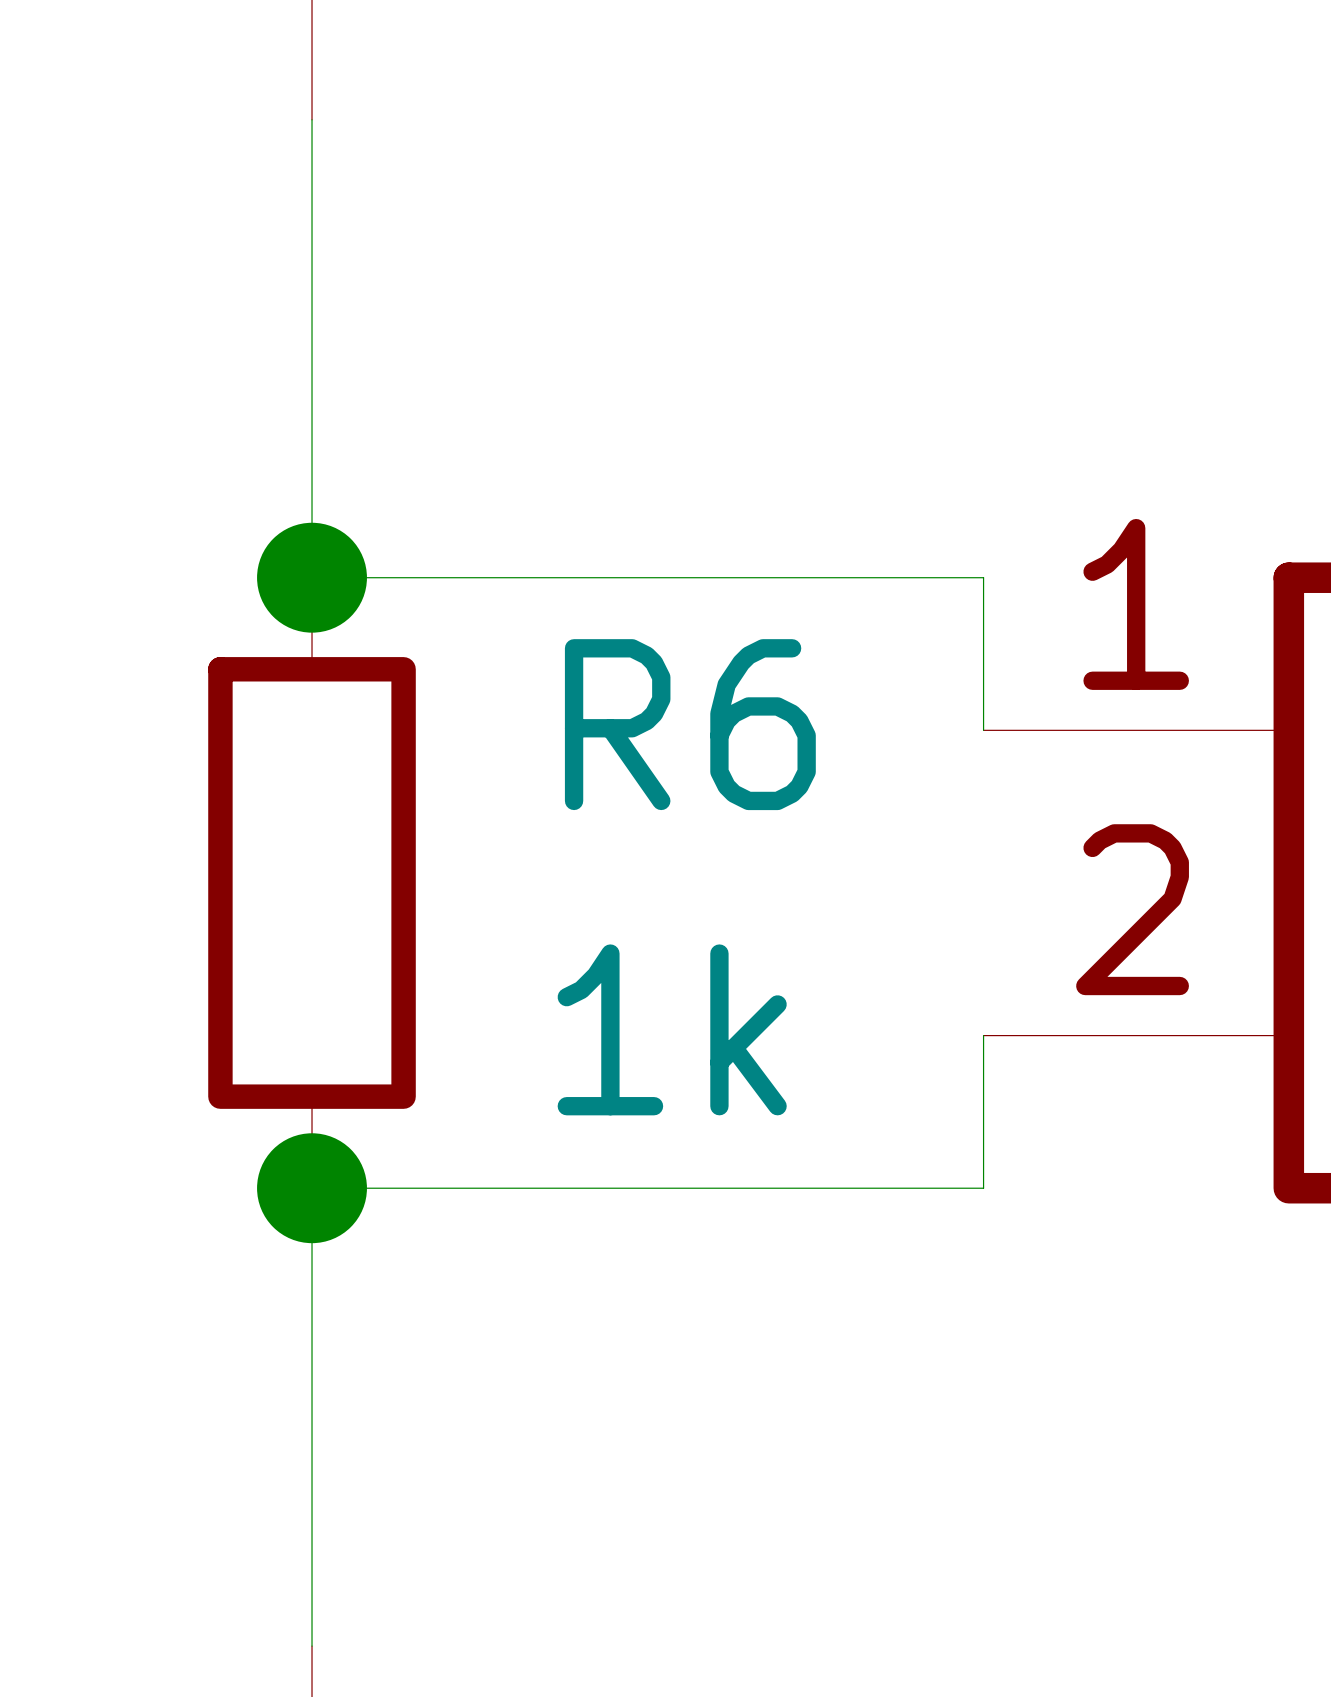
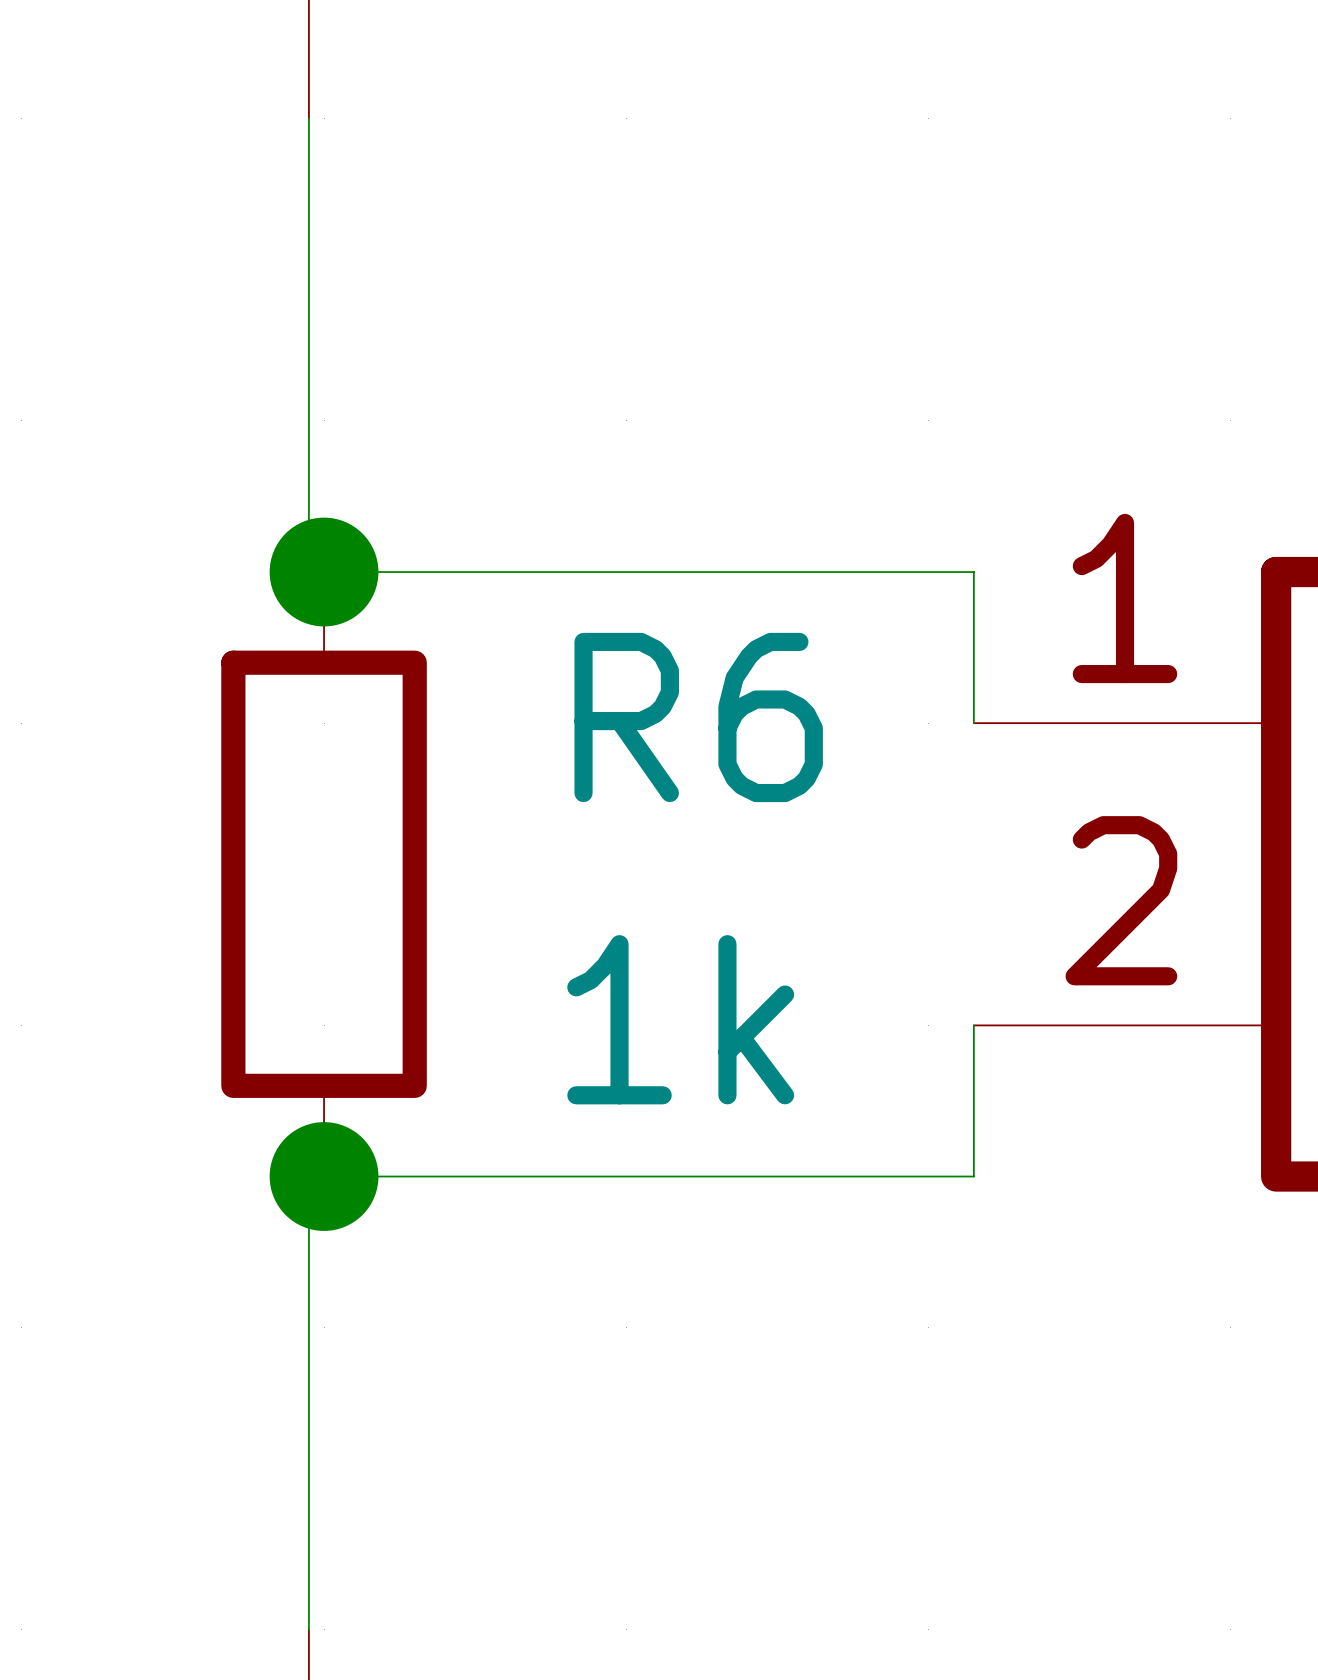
junction position: (312, 577) -> (324, 572)
R6 position: (312, 882) -> (324, 874)
junction position: (312, 1188) -> (324, 1176)

